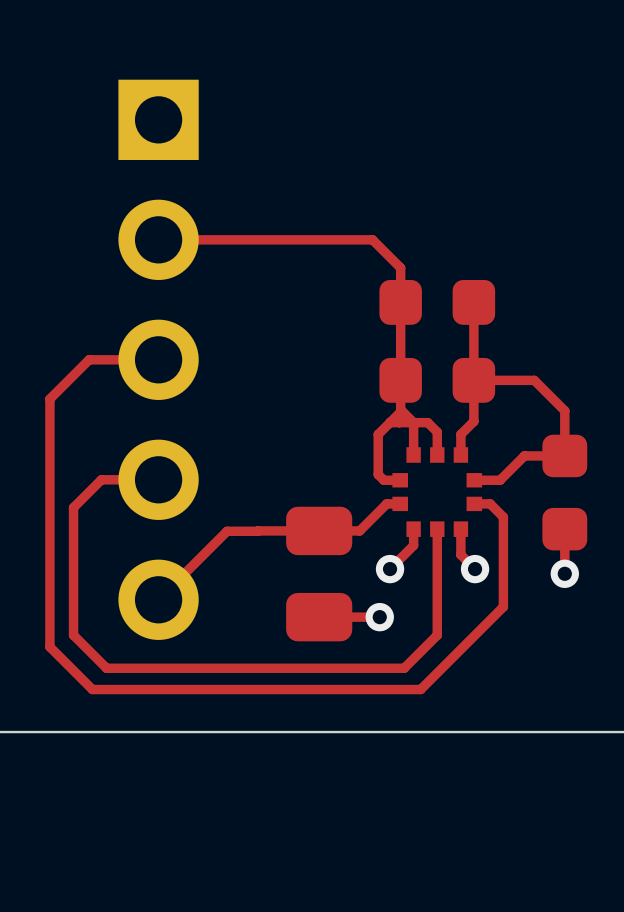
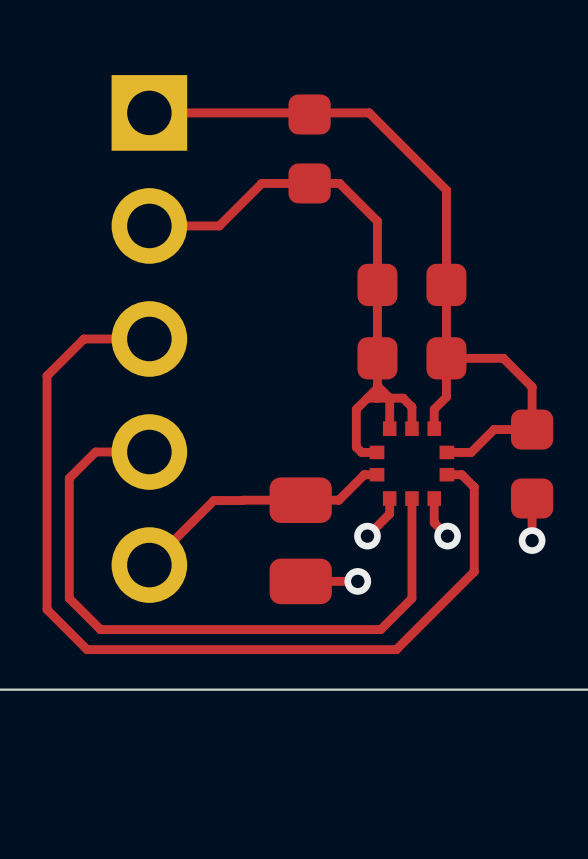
top track: none -> (149, 112) (369, 112) (446, 190) (446, 284)
part: none -> (309, 148)
top track: (232, 239) (372, 239) (400, 267) -> (219, 225) (261, 183) (339, 183) (377, 221) (377, 252)

